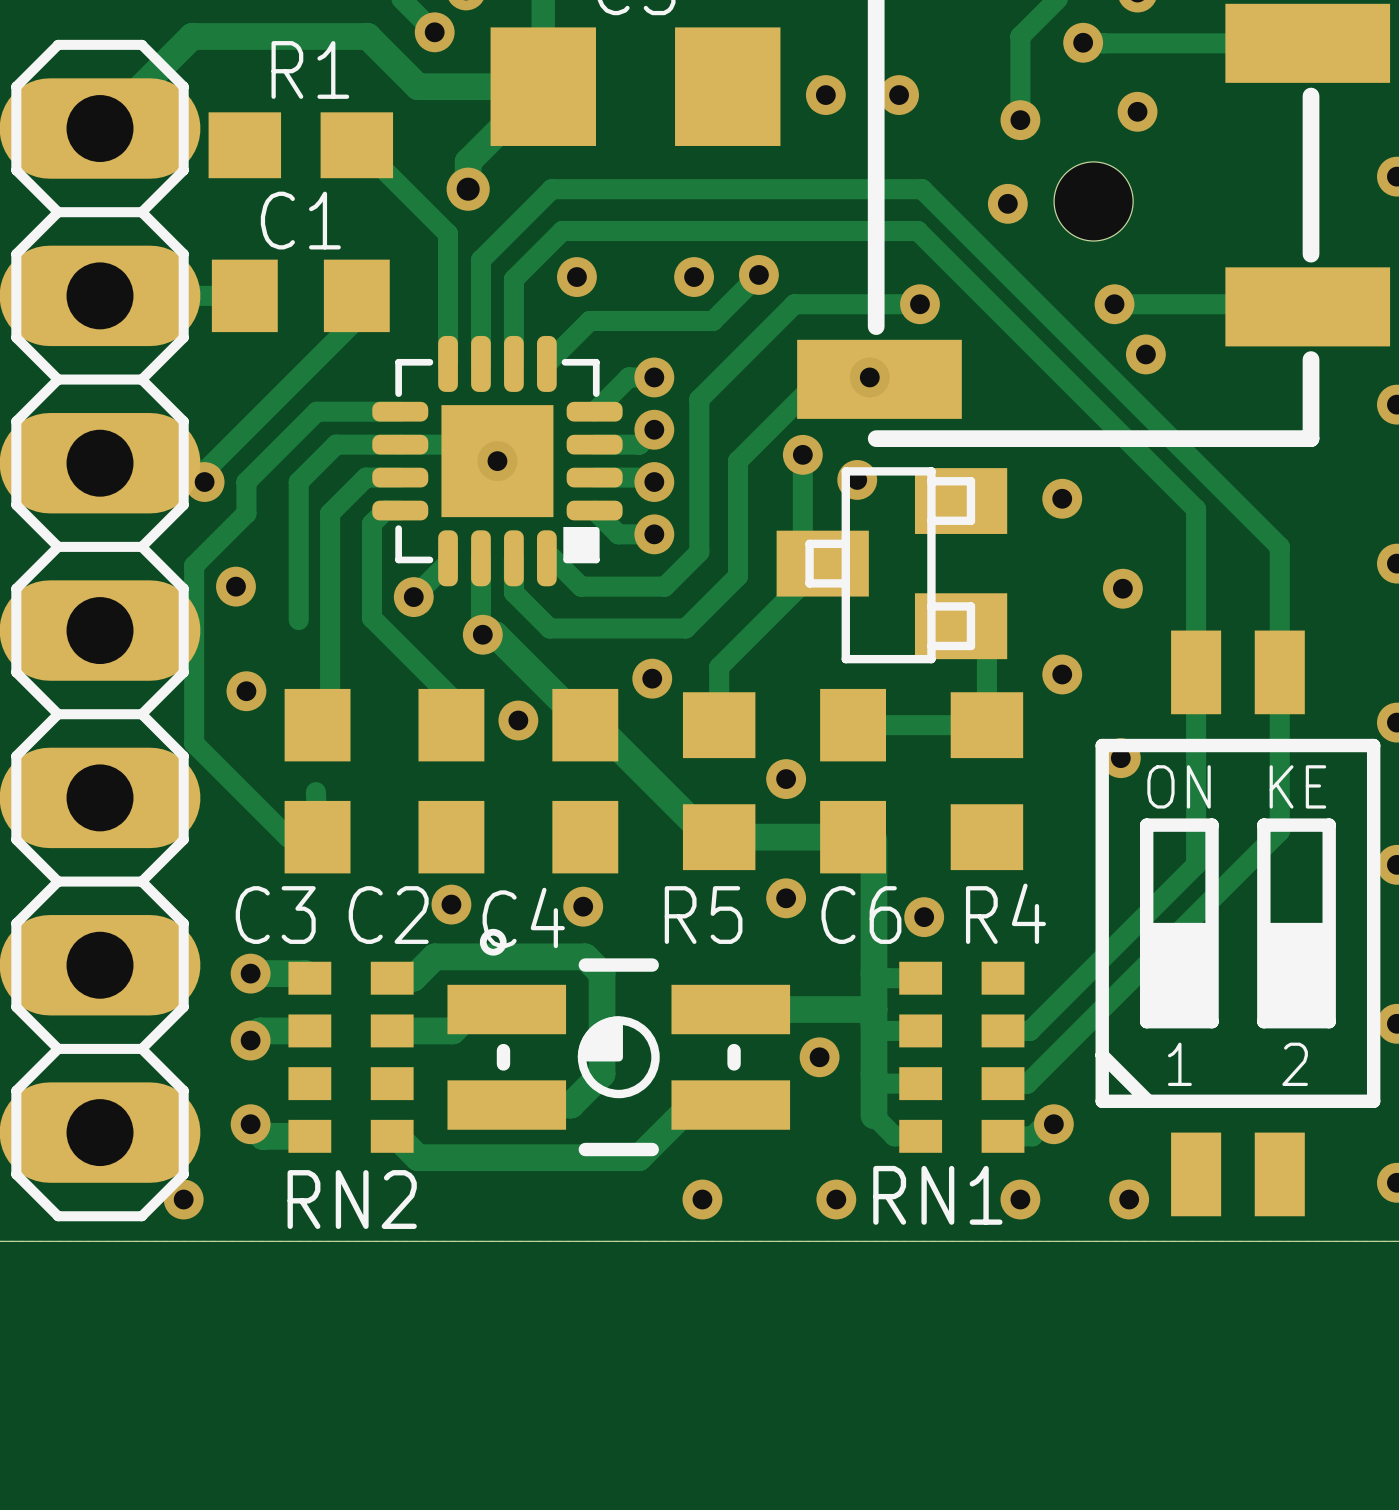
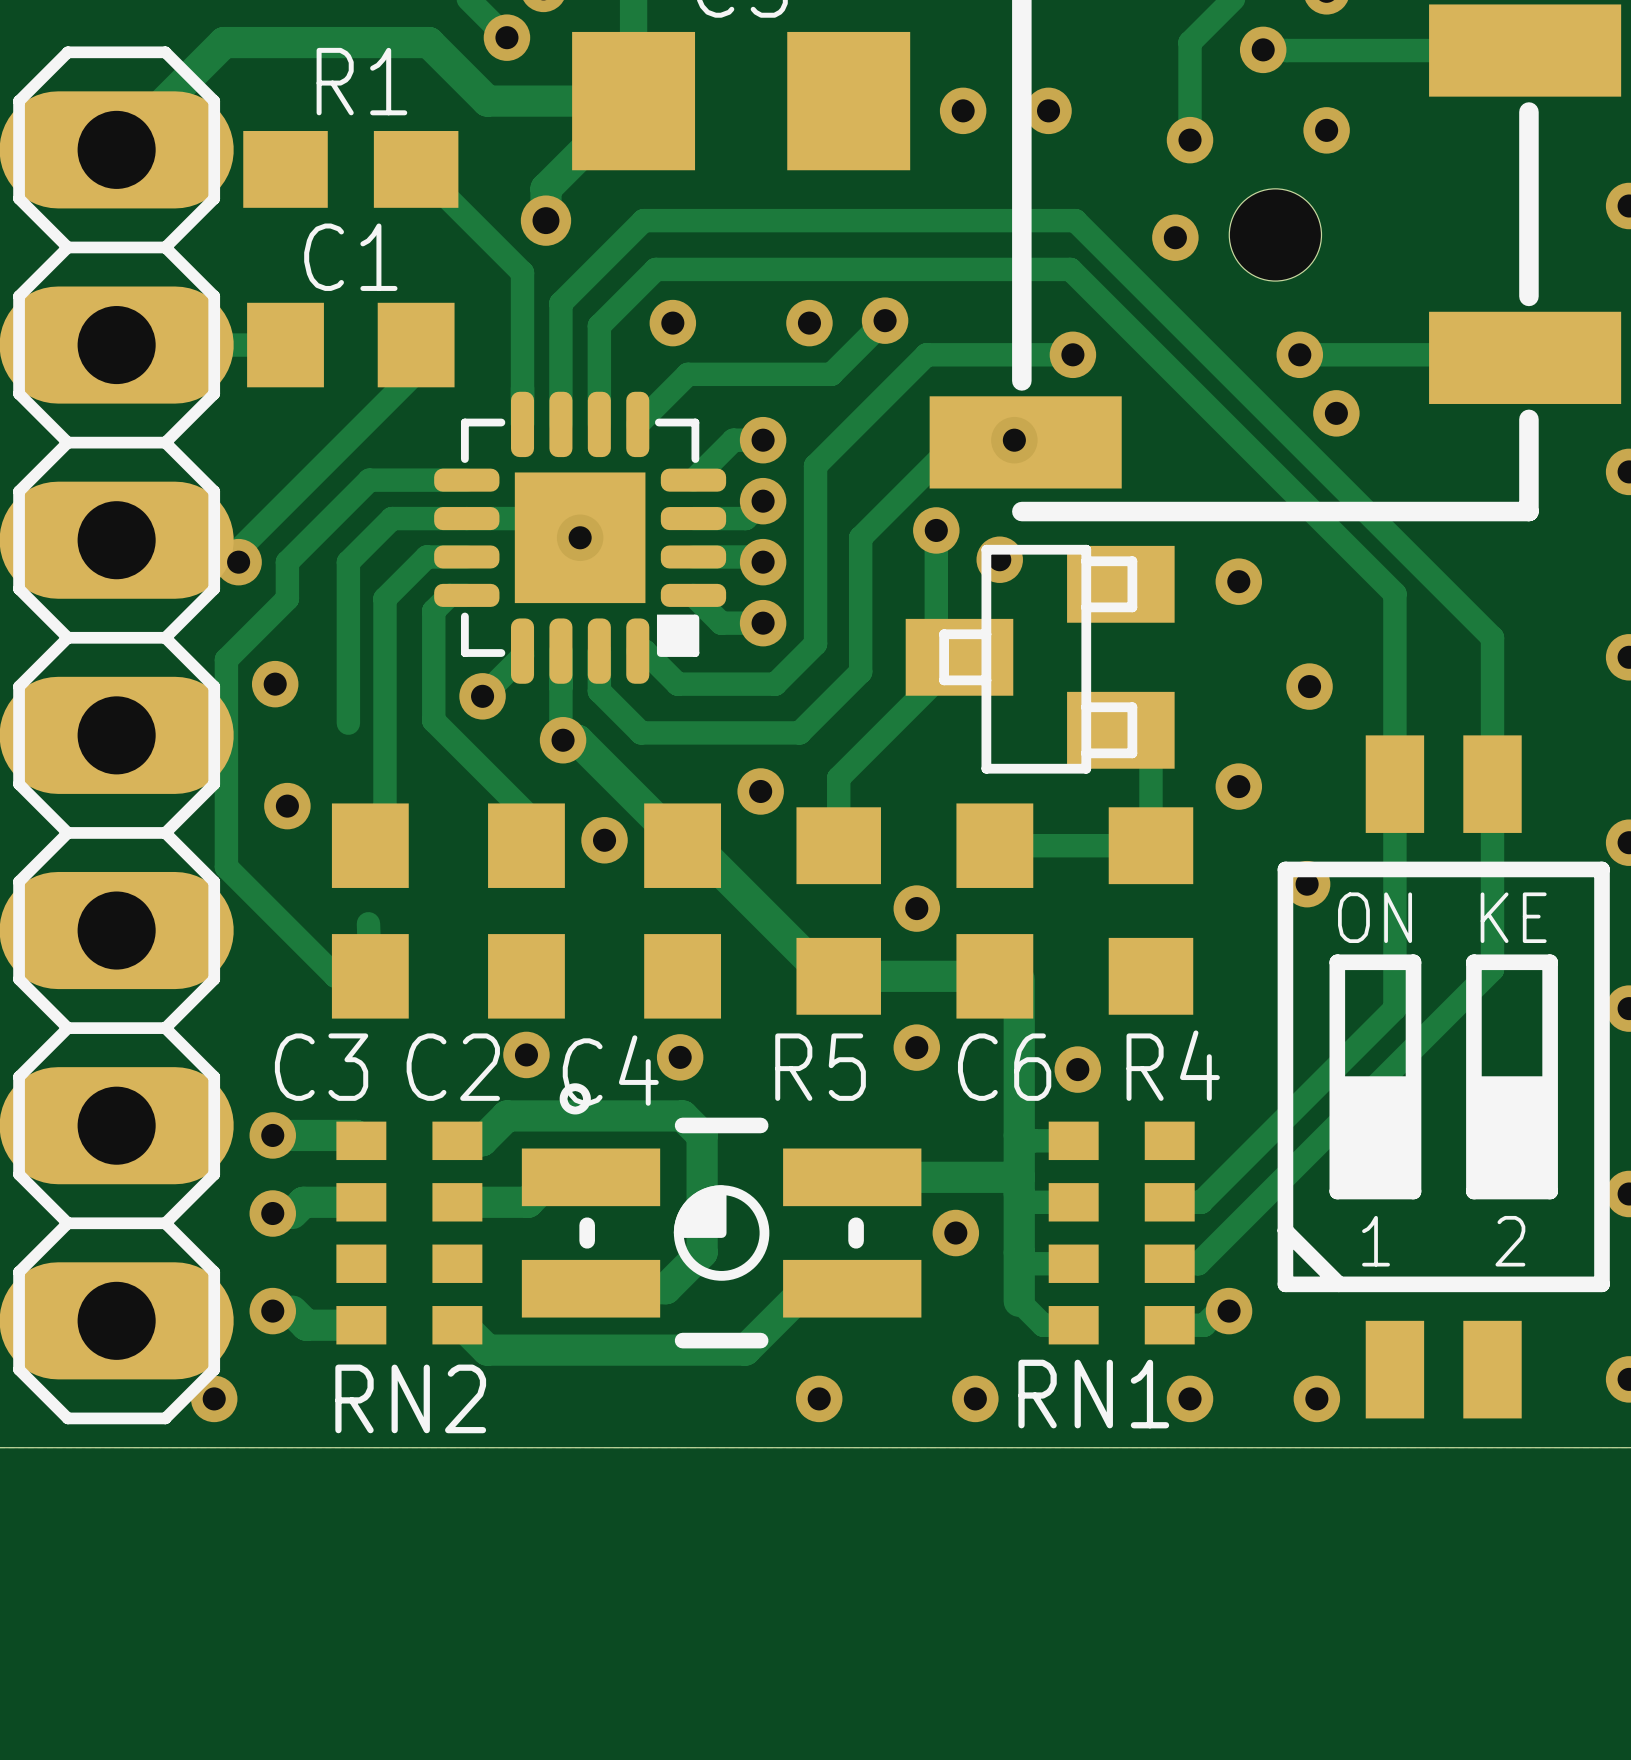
via position: (250, 973) -> (272, 1135)
via position: (250, 1040) -> (272, 1213)
via position: (250, 1124) -> (272, 1311)

